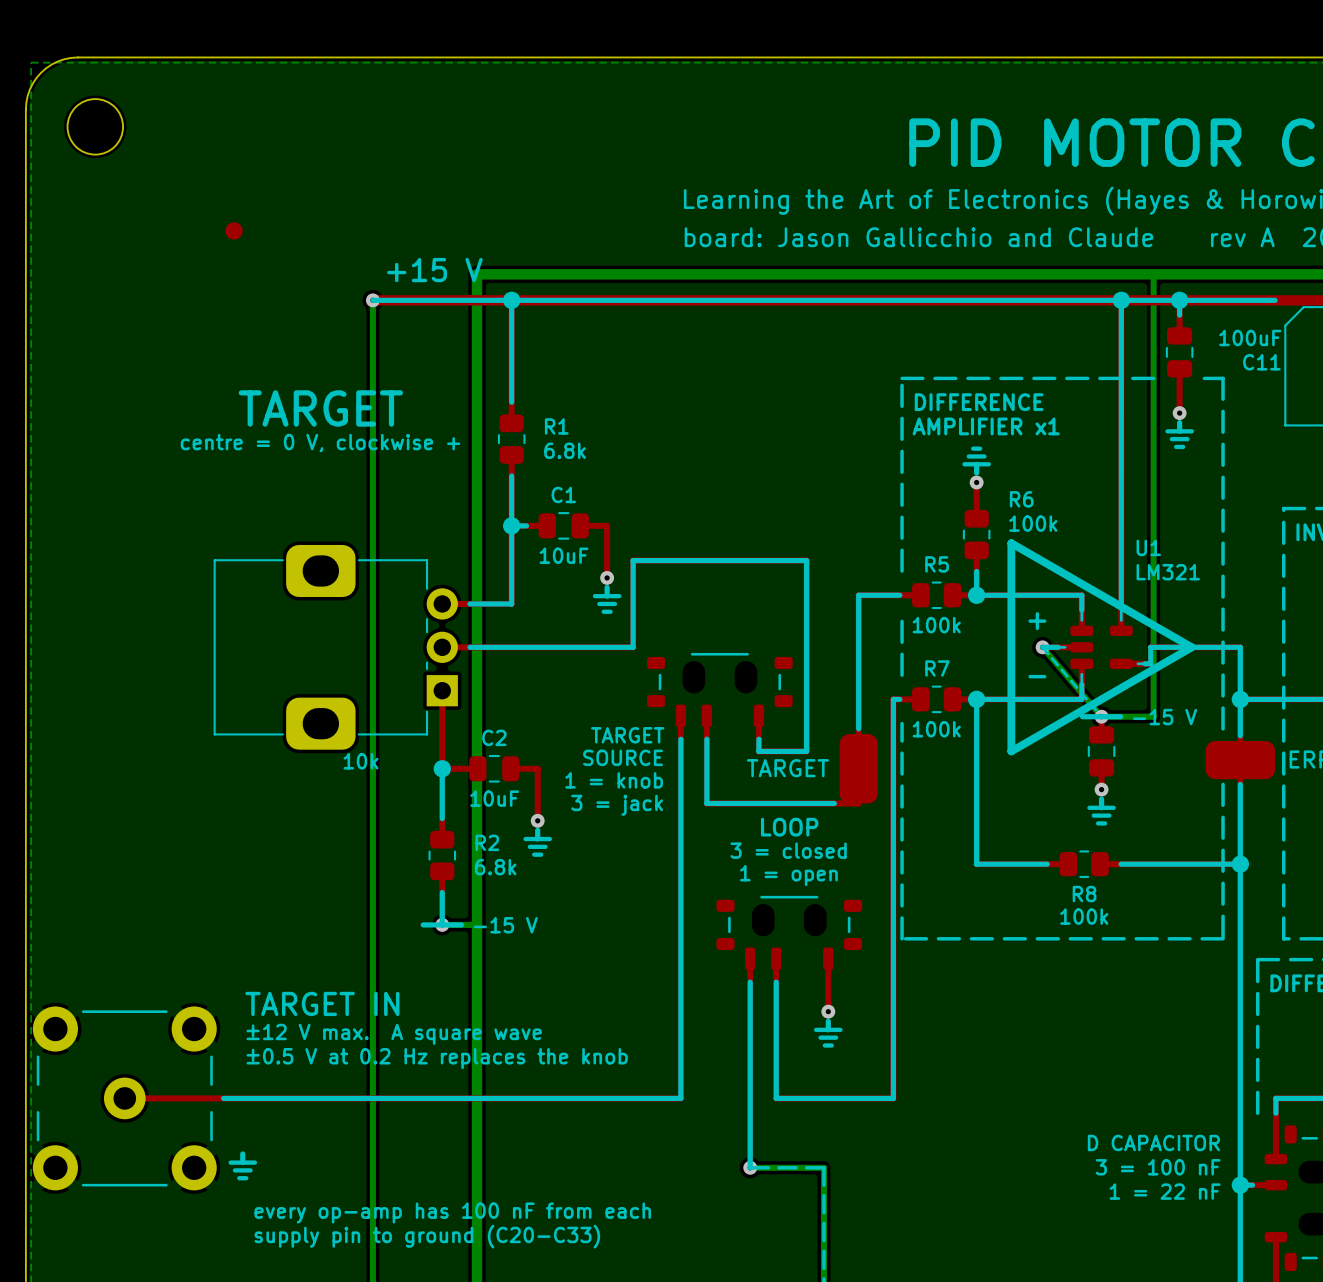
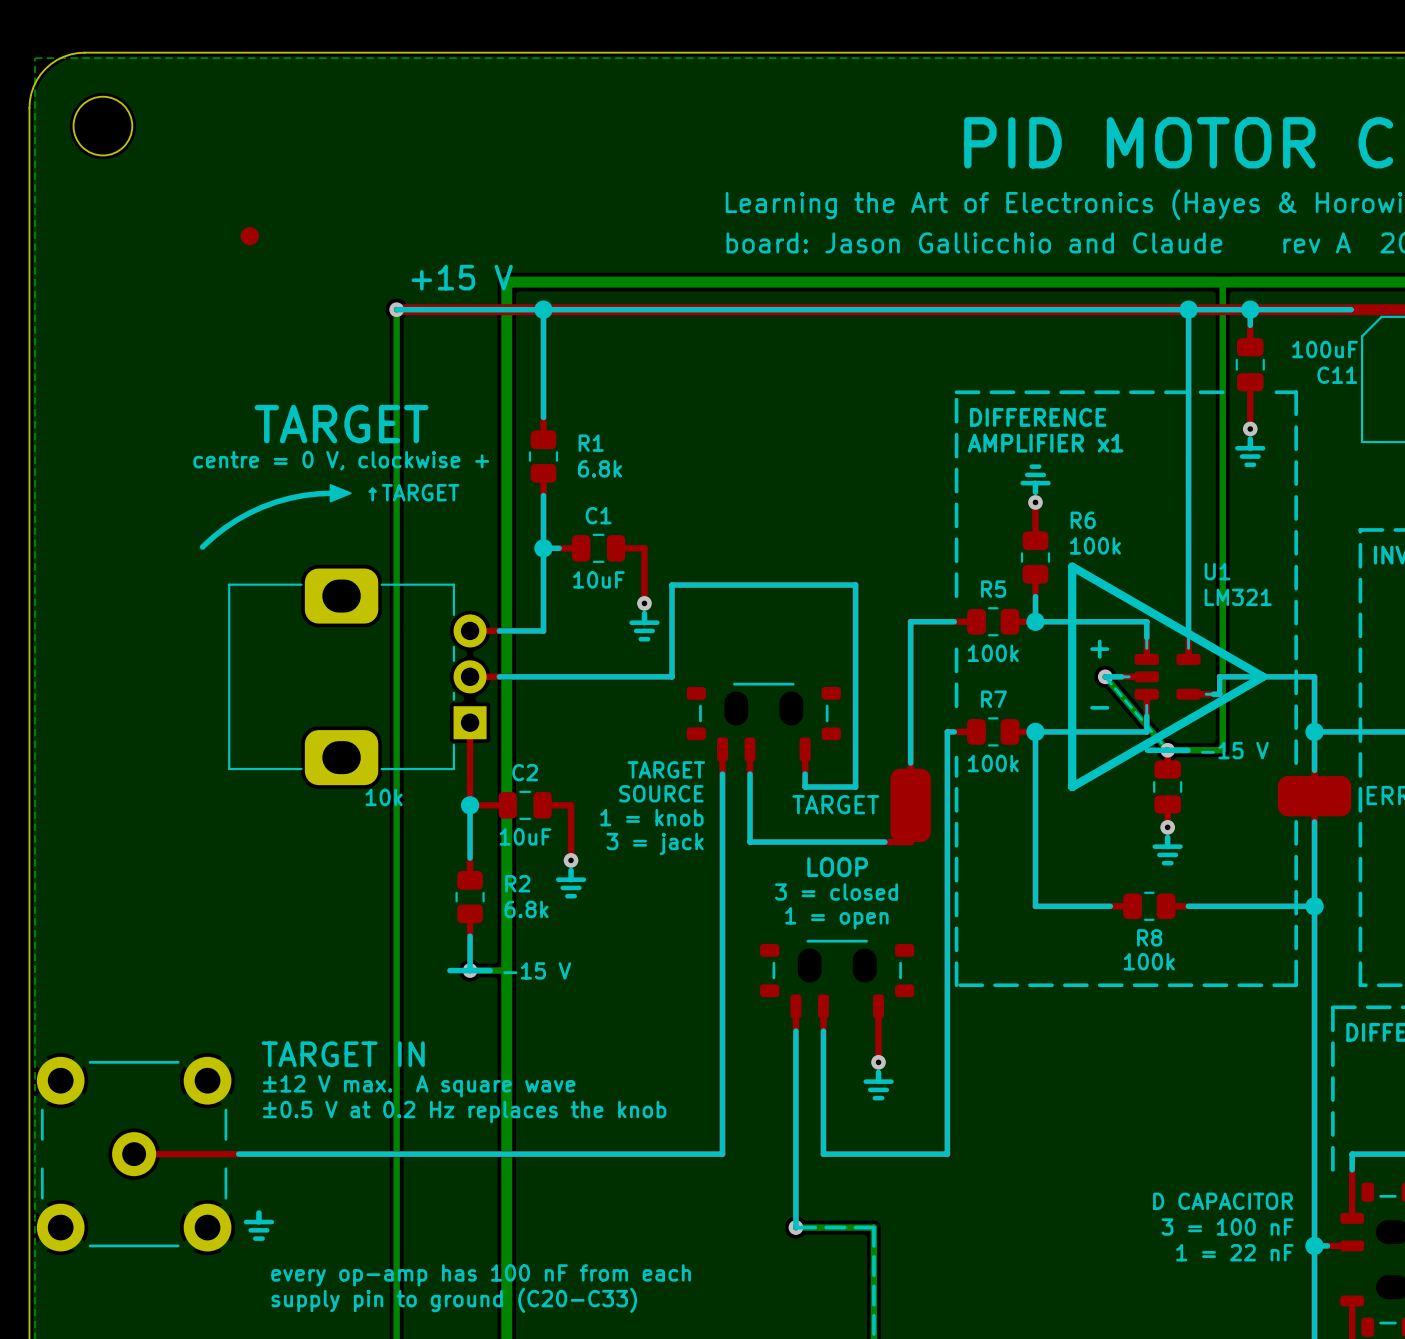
drawing: none -> [329, 484, 352, 503]
line: none -> (332, 493) (303, 495) (262, 507) (236, 520) (202, 547)
text: none -> ↑TARGET (413, 492)

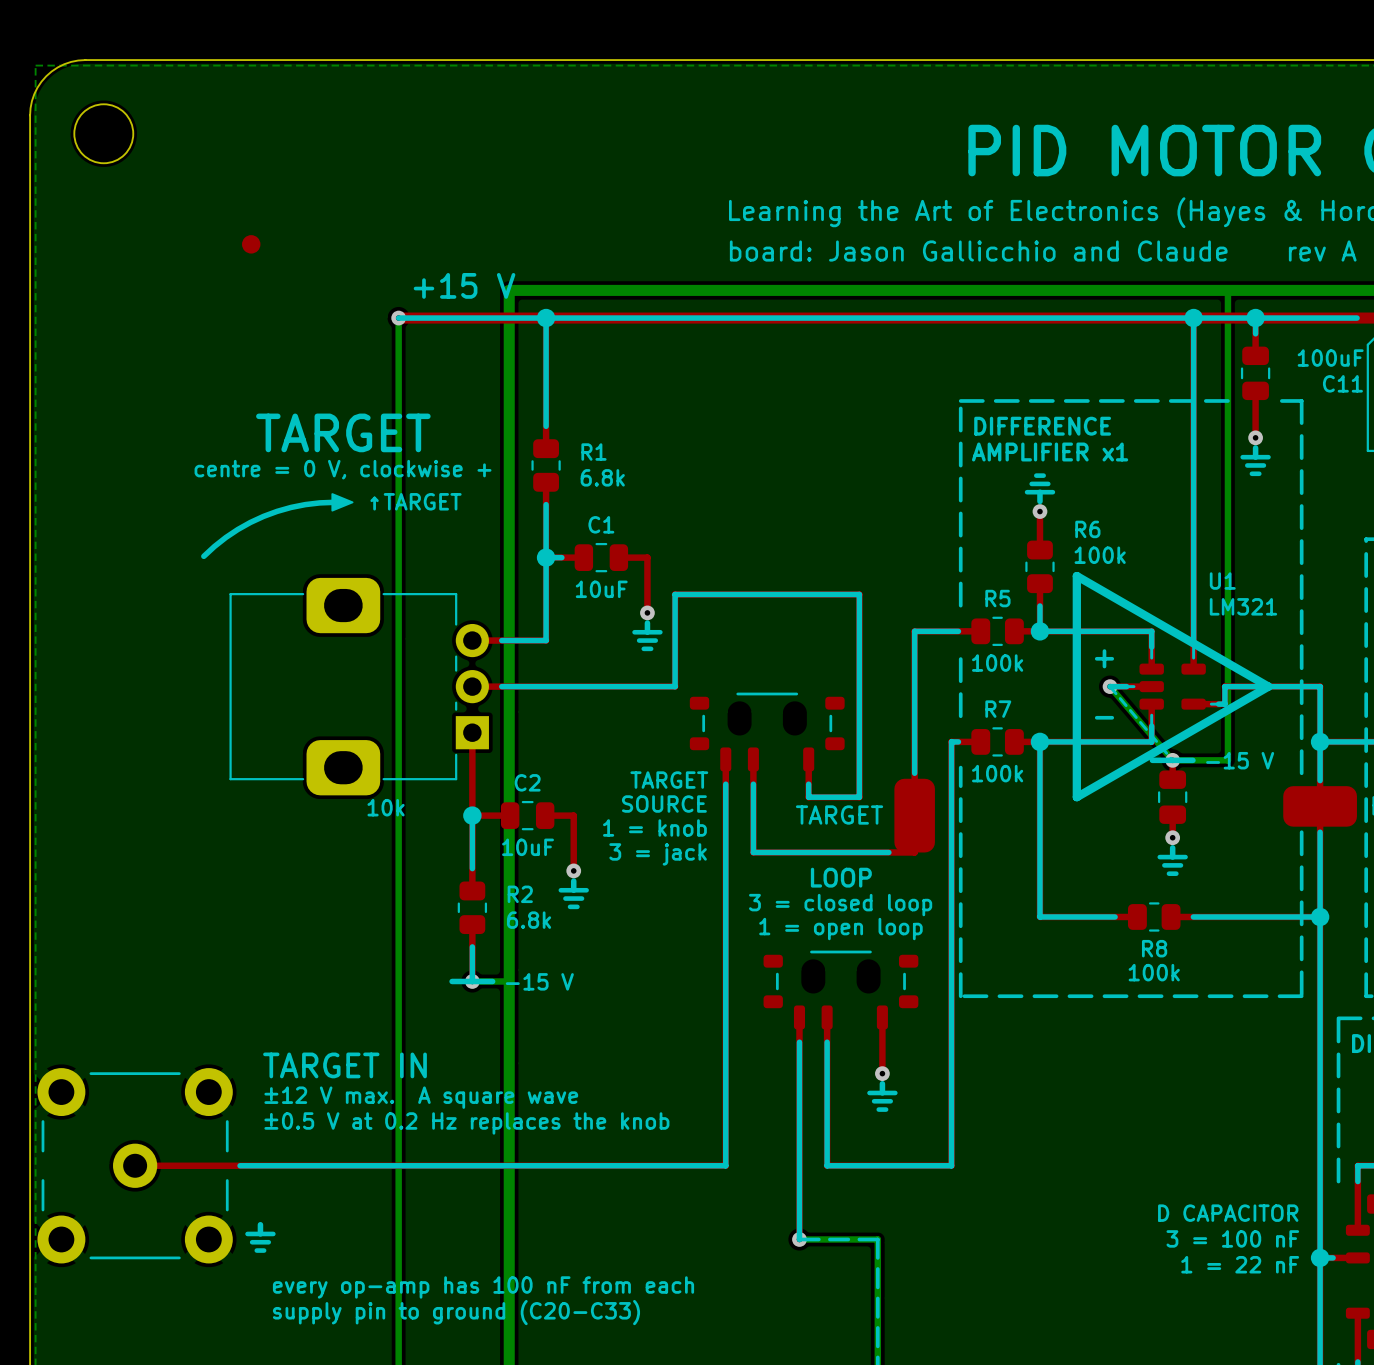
text: 3 = closed (836, 891) -> 3 = closed loop (840, 905)
text: 1 = open (836, 918) -> 1 = open loop (840, 929)

